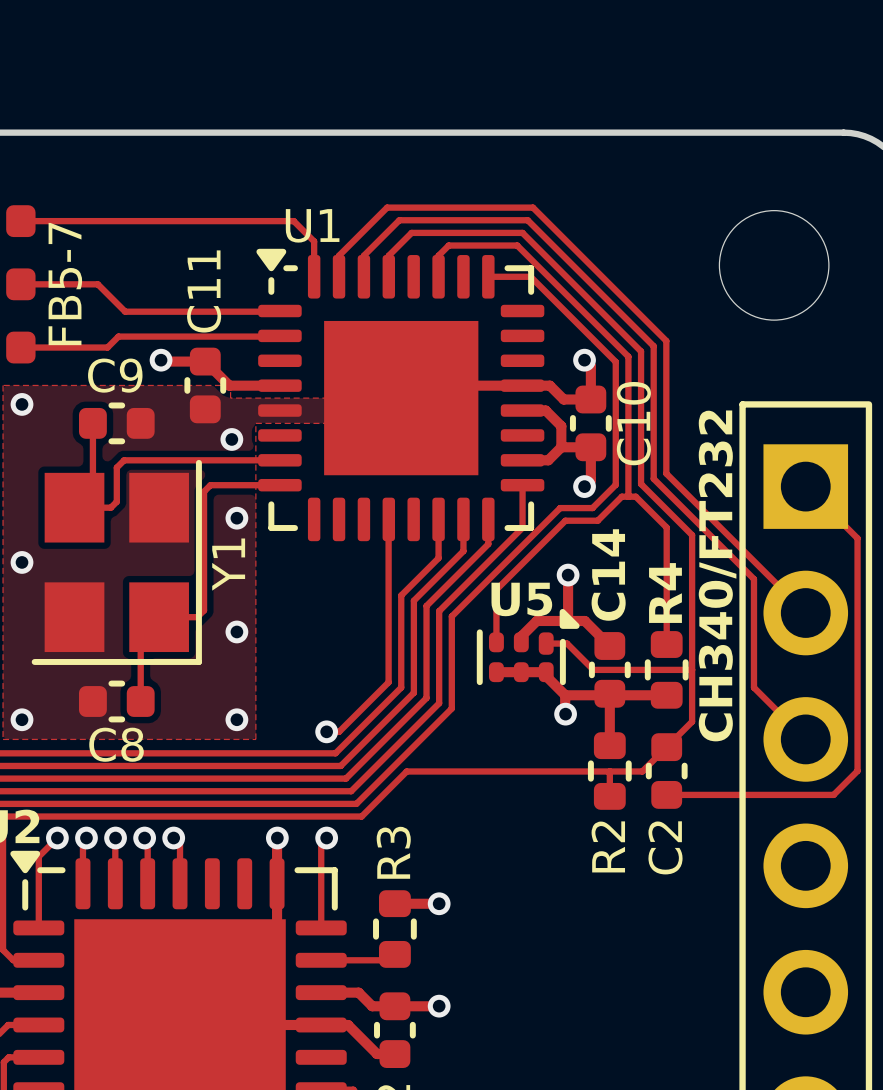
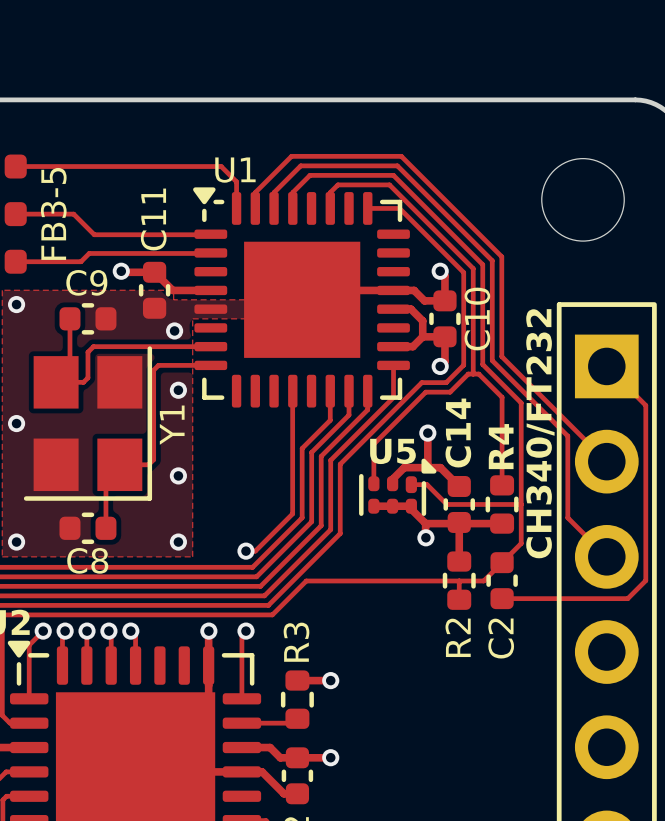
text: FB5-7 (65, 284) -> FB3-5 (53, 213)

